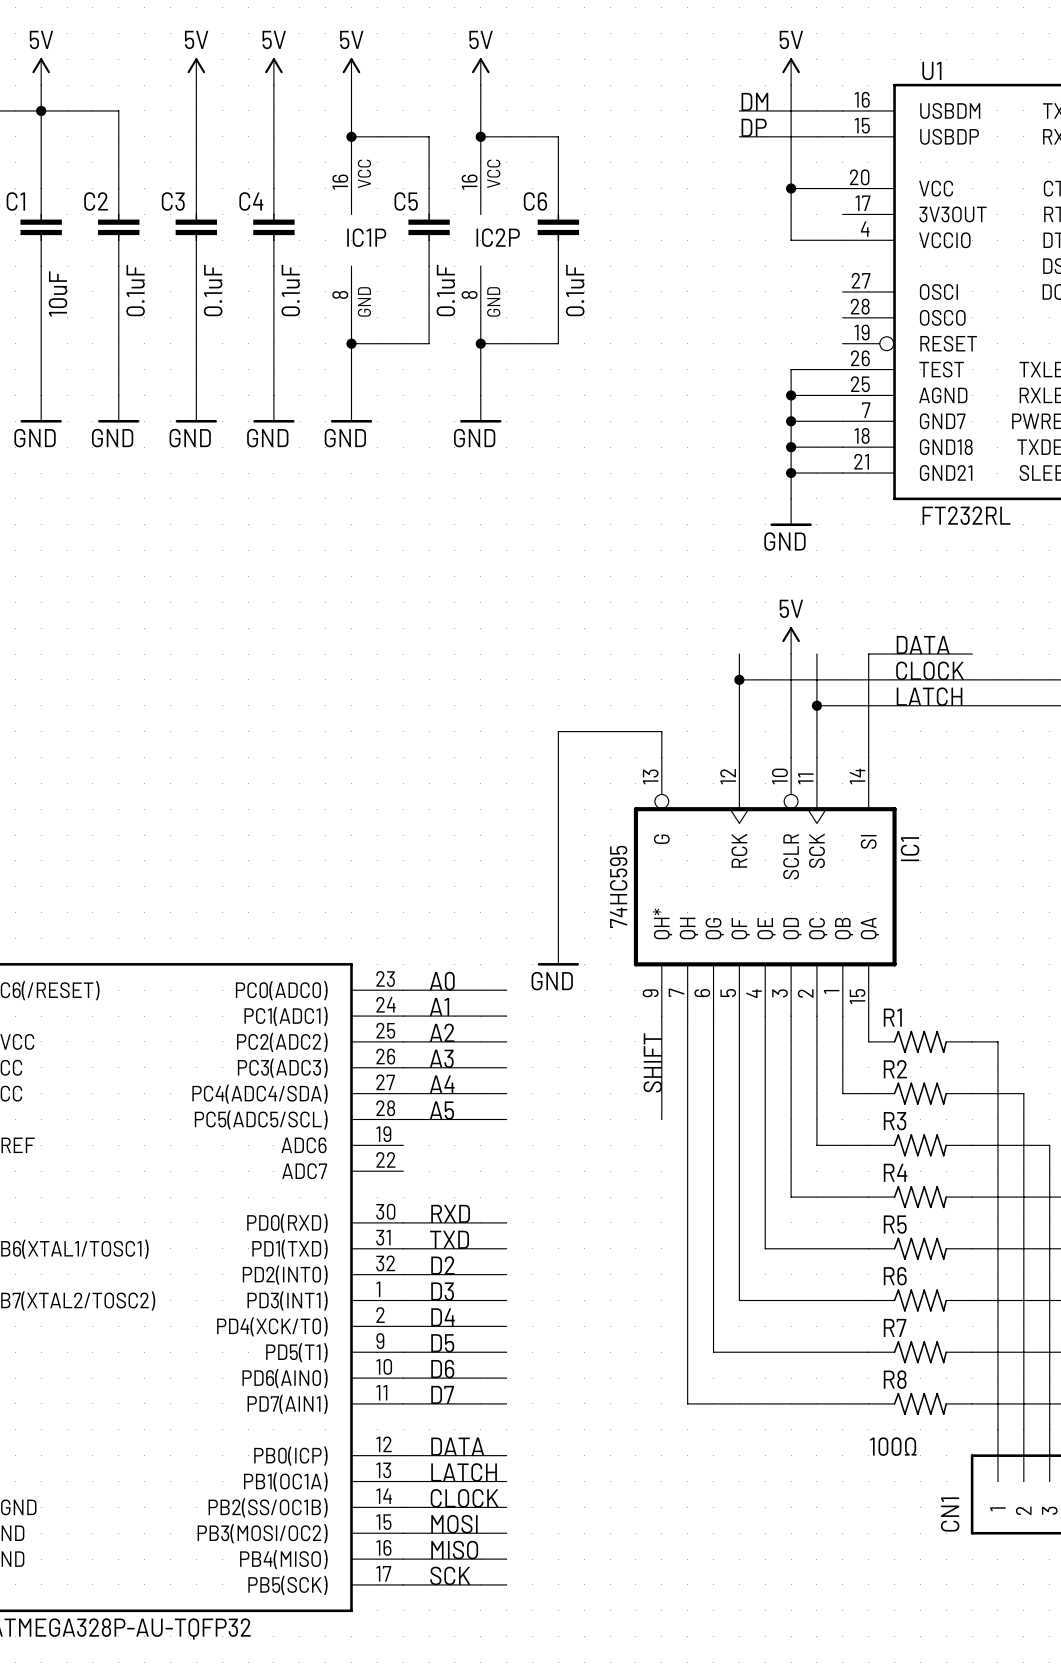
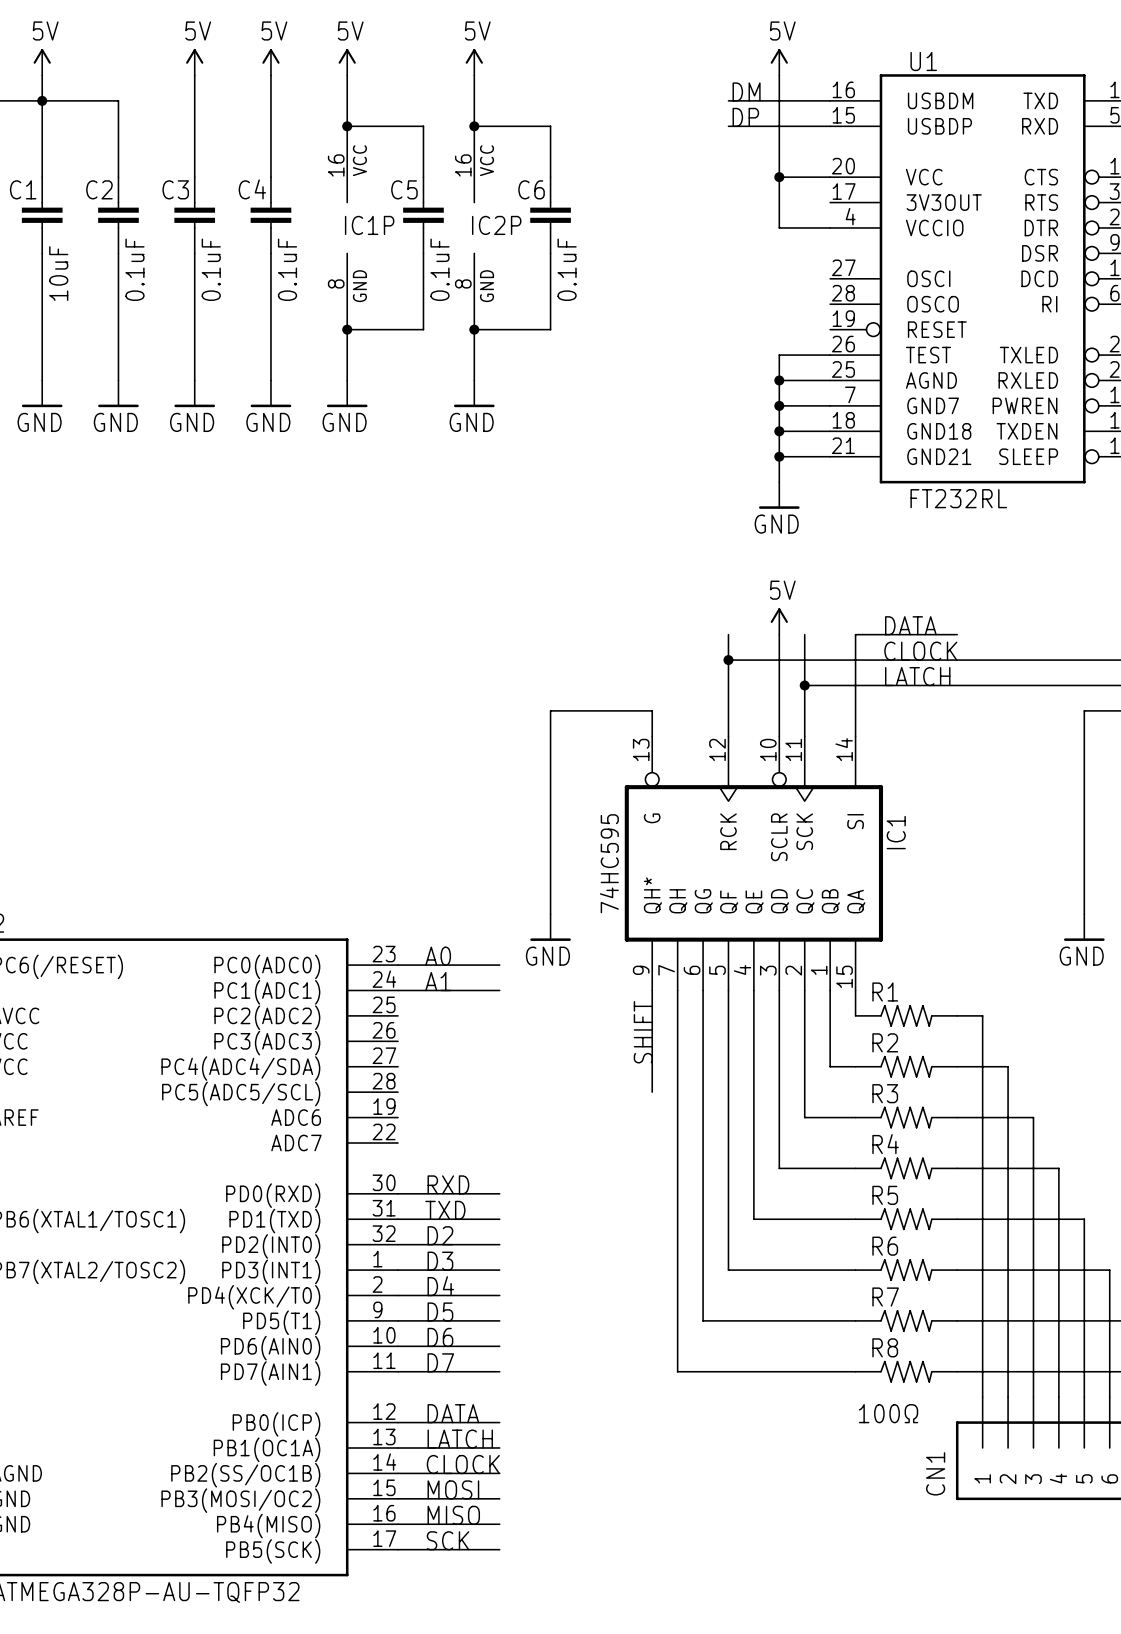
label: A2 (442, 1032) -> none
wire: (403, 1041) (506, 1041) -> none
label: A3 (441, 1058) -> none
wire: (403, 1067) (506, 1067) -> none
label: A4 (442, 1084) -> none
wire: (403, 1093) (506, 1093) -> none
label: A5 (441, 1110) -> none
wire: (403, 1119) (506, 1119) -> none

